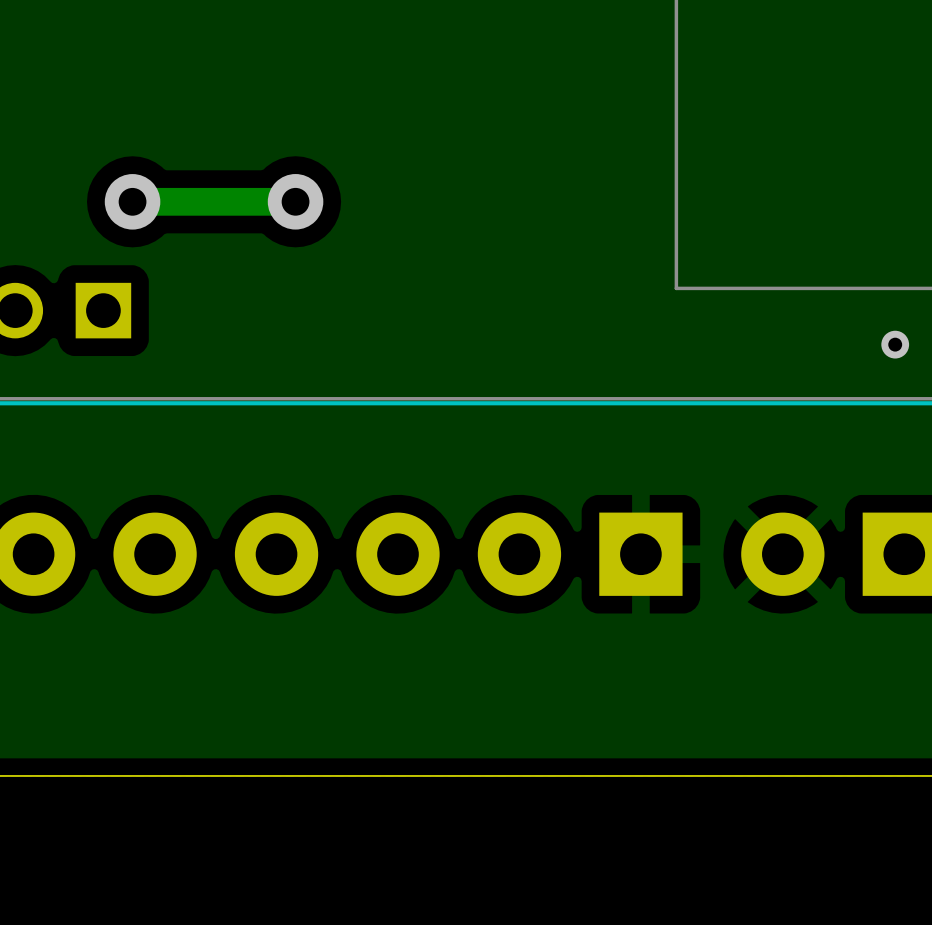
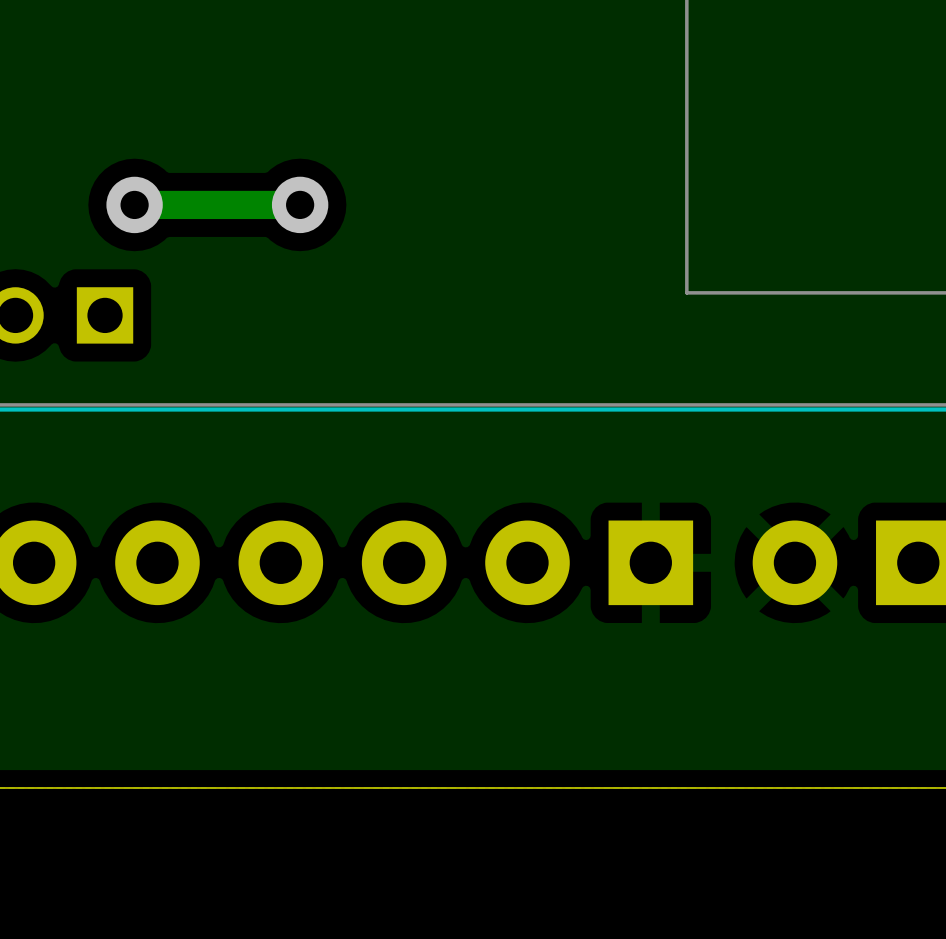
via: (895, 344) -> none

